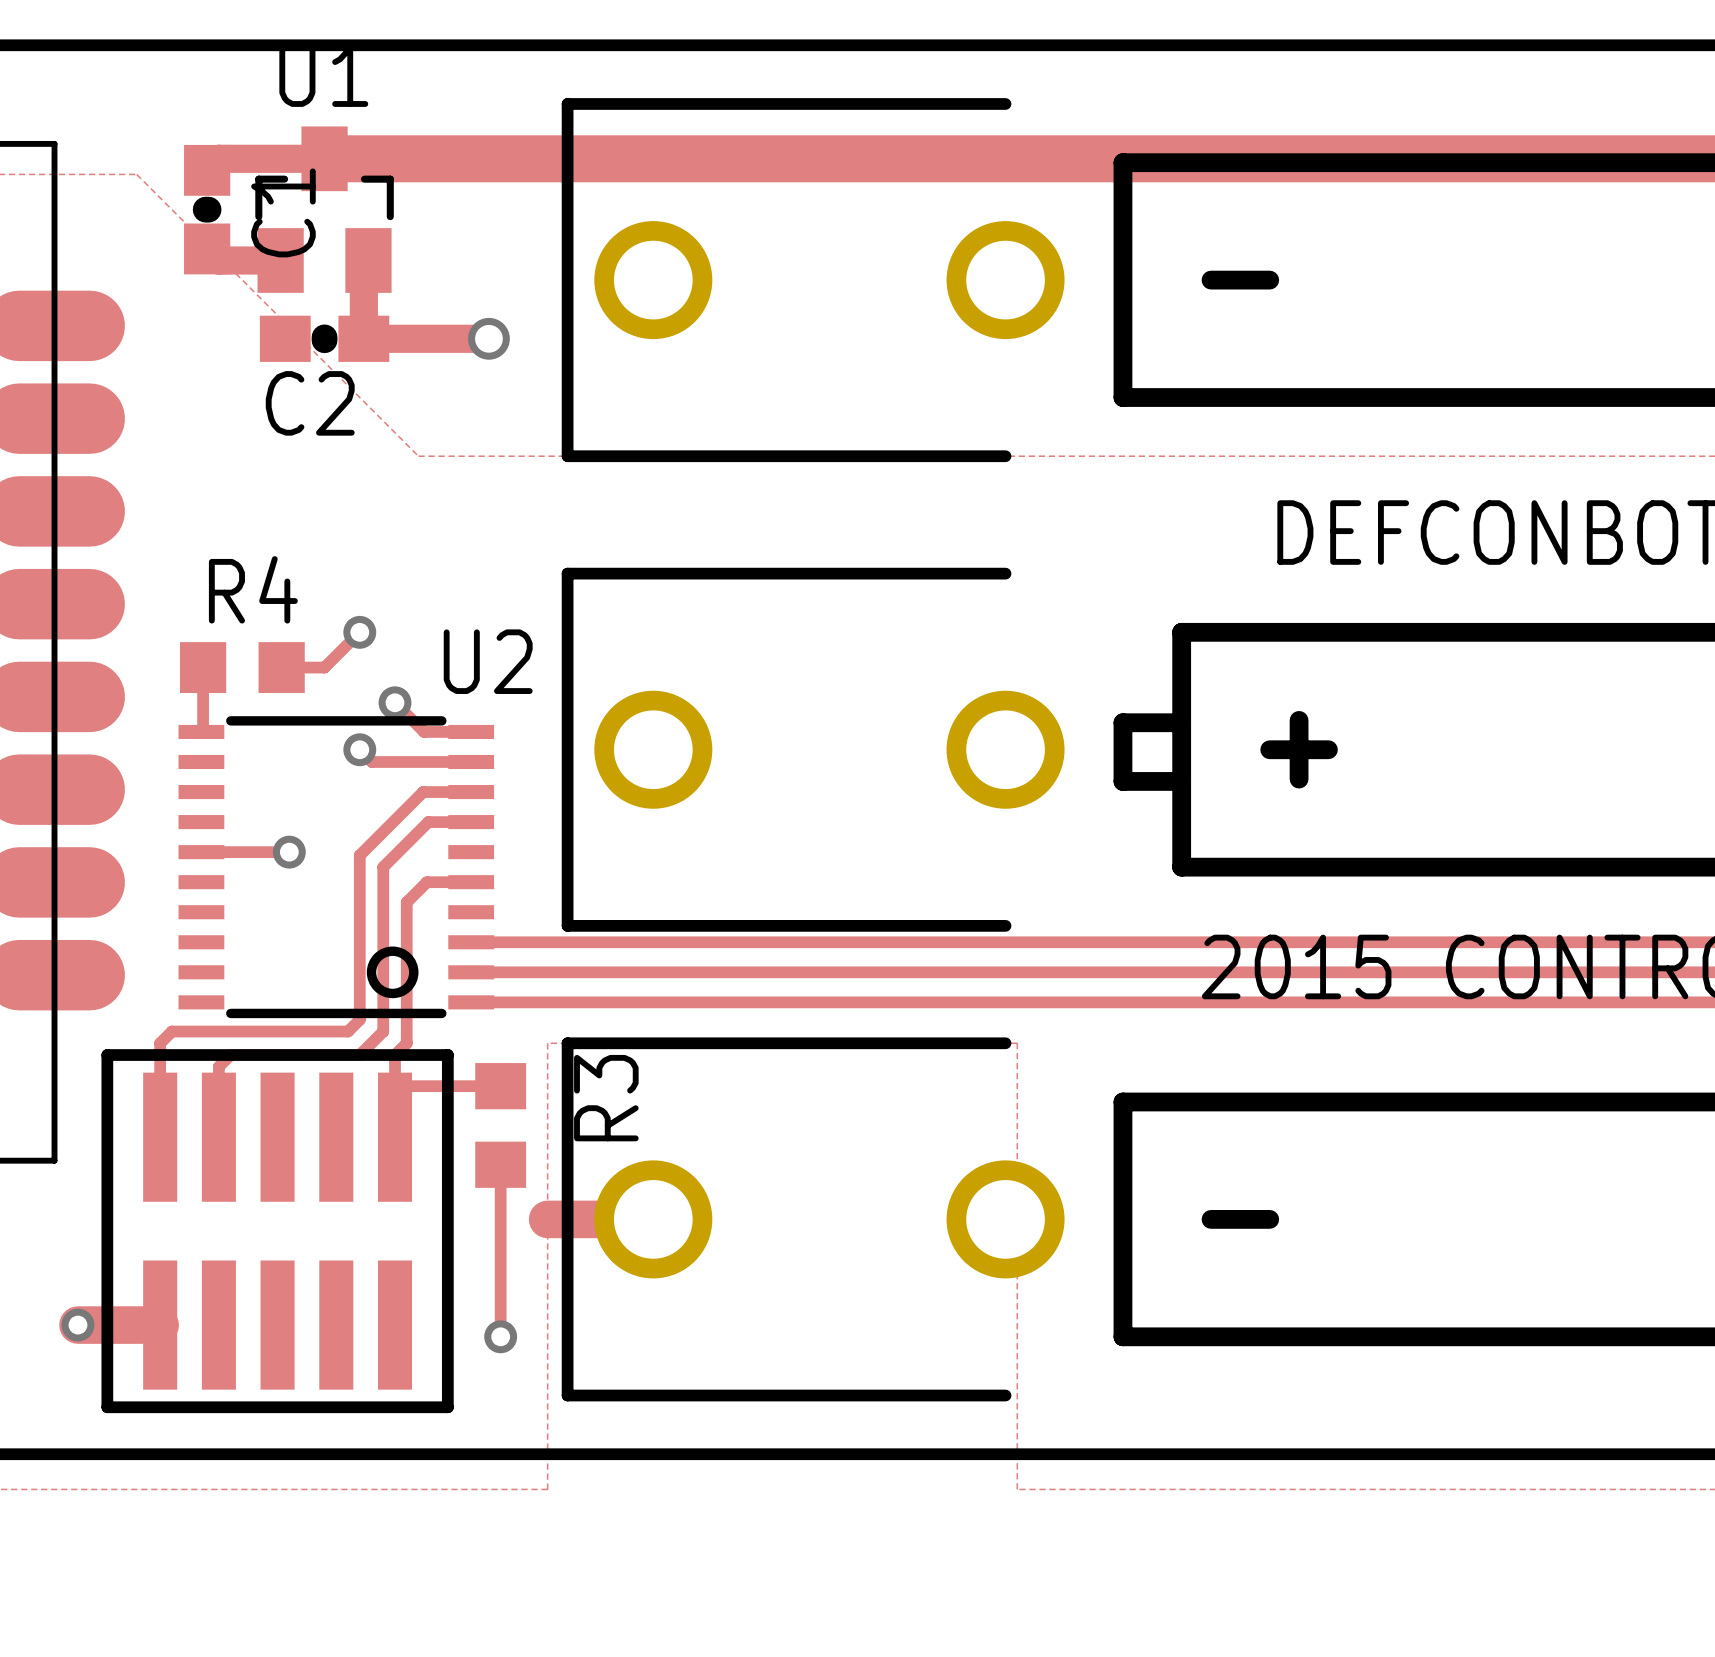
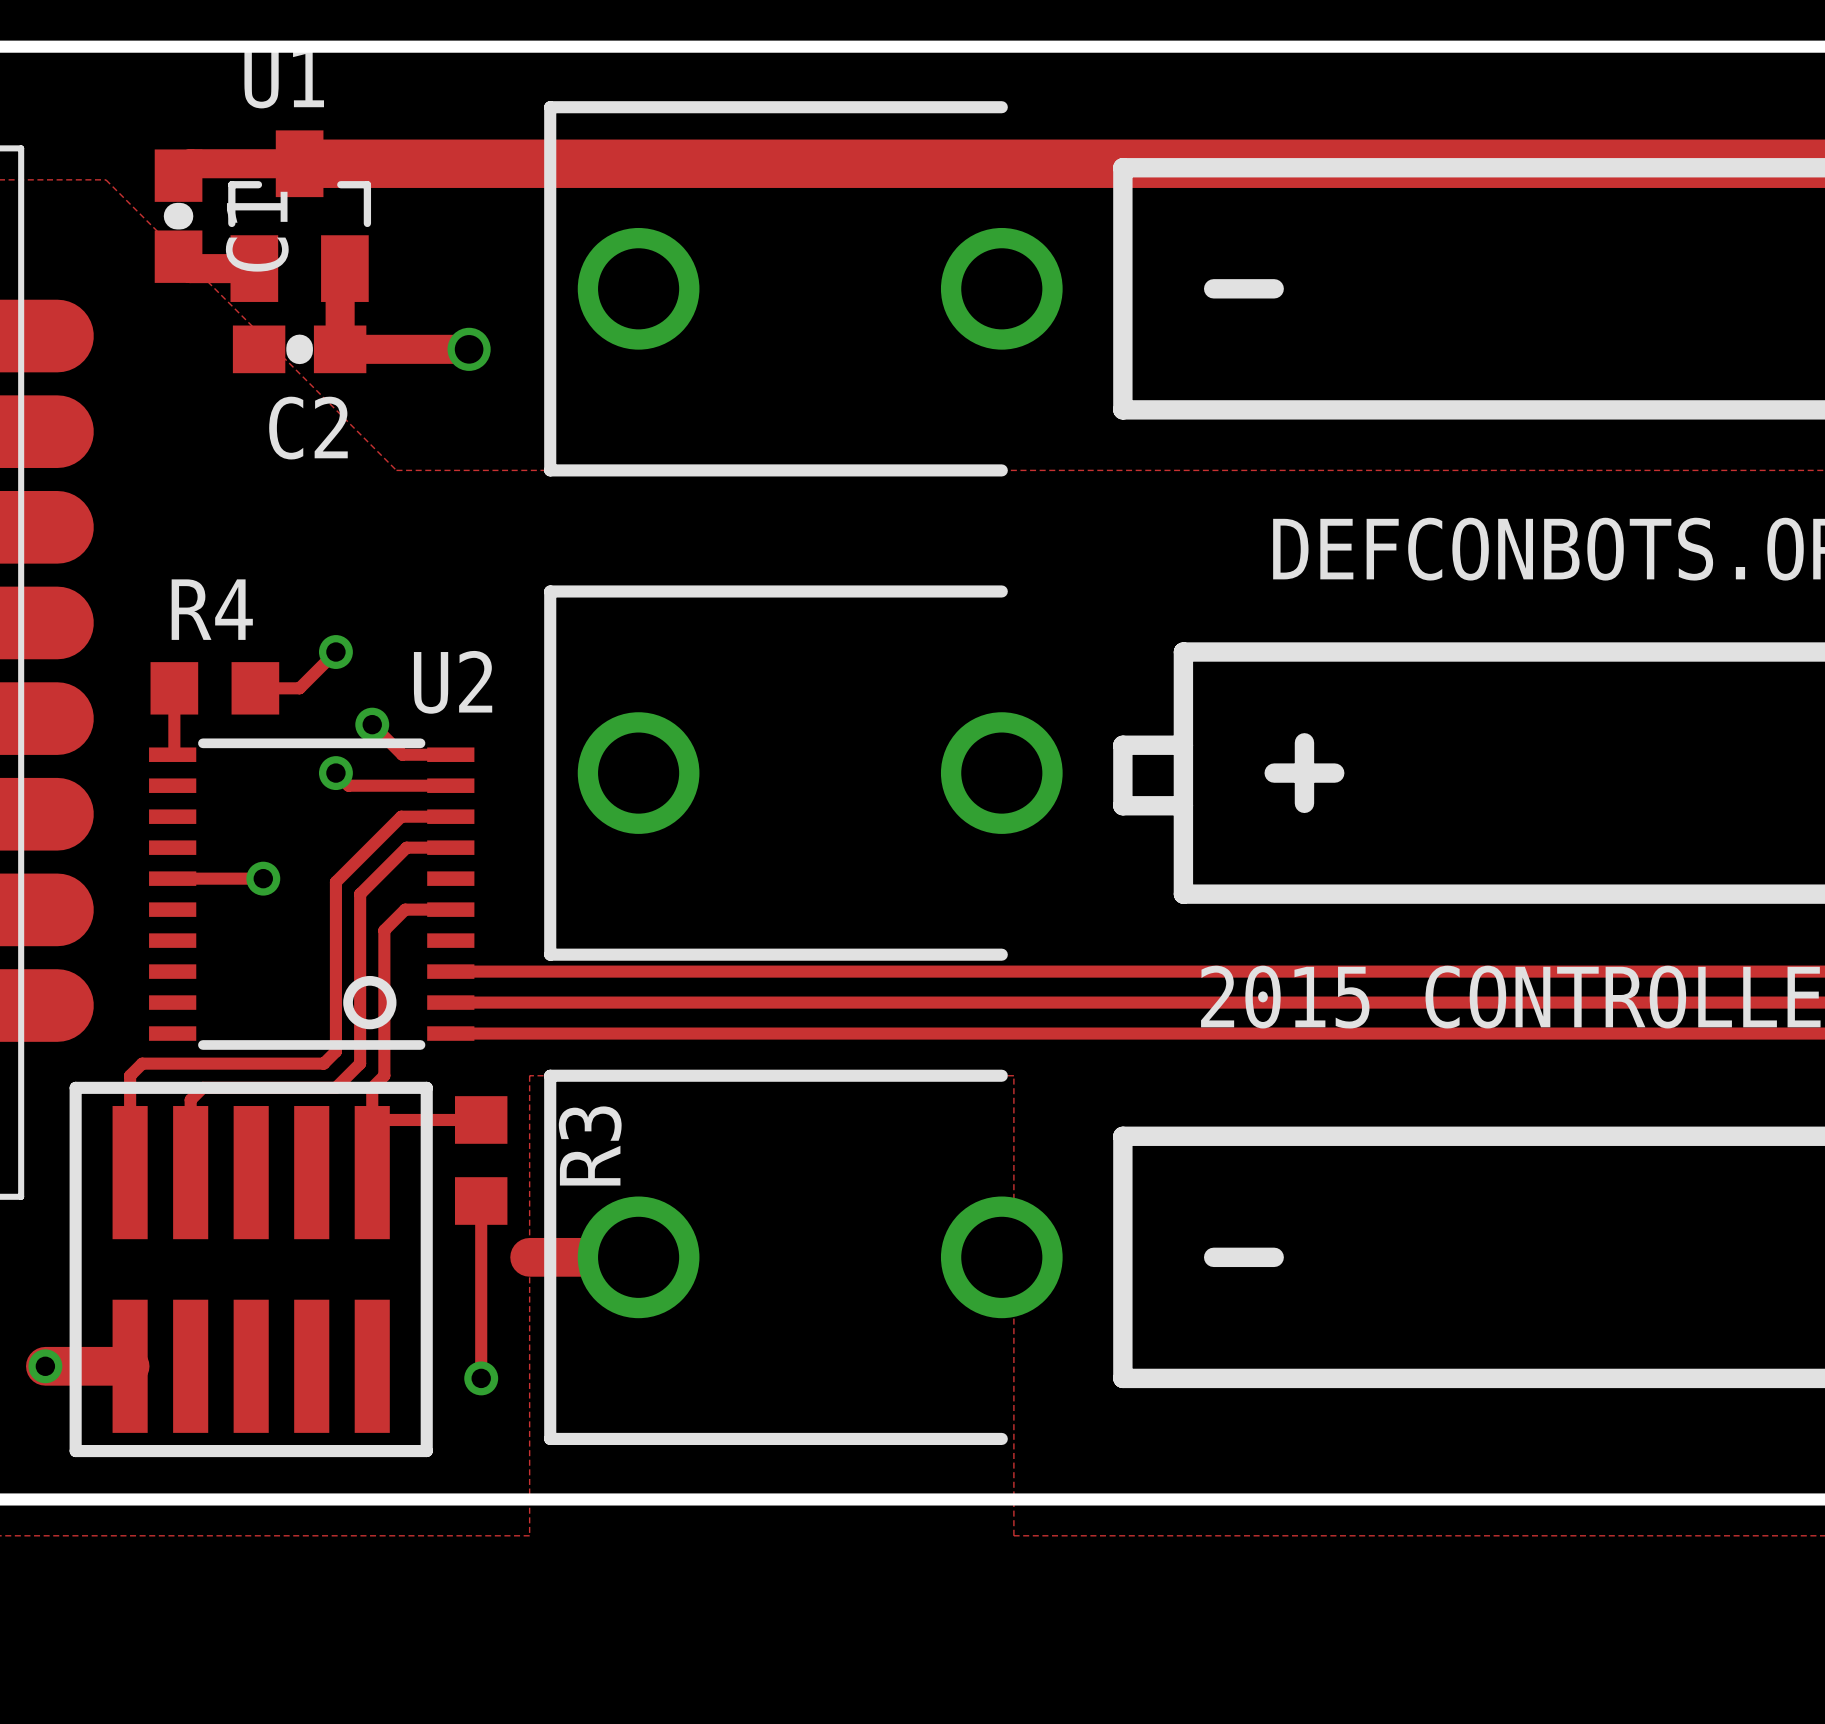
C2 name position: C2 (310, 403) -> C2 (308, 428)

